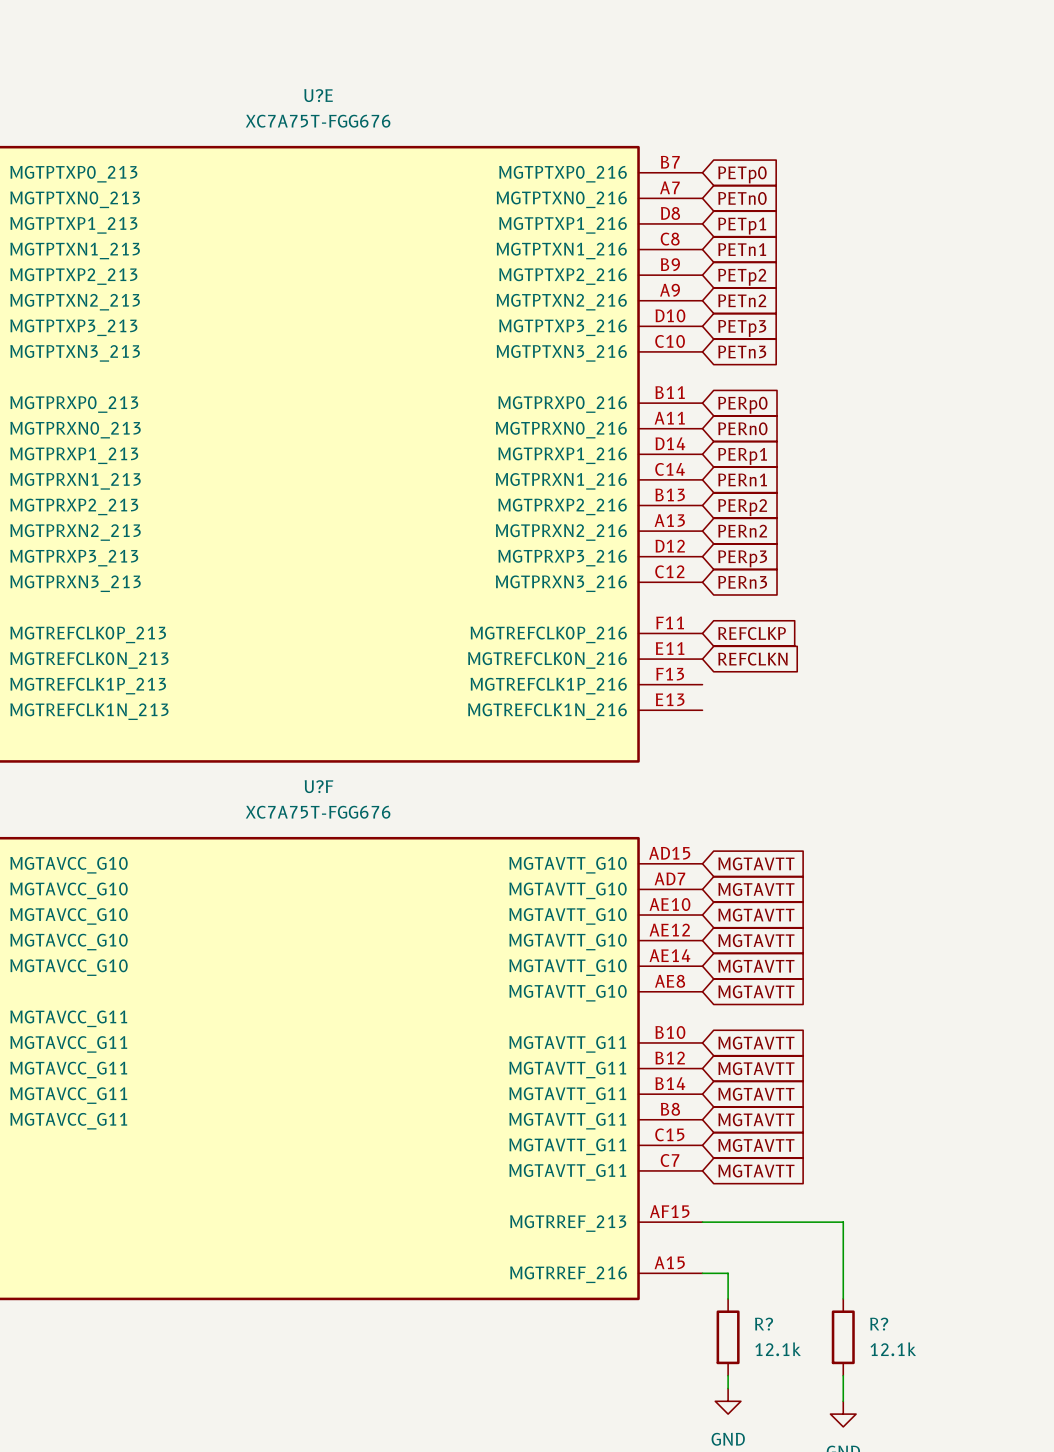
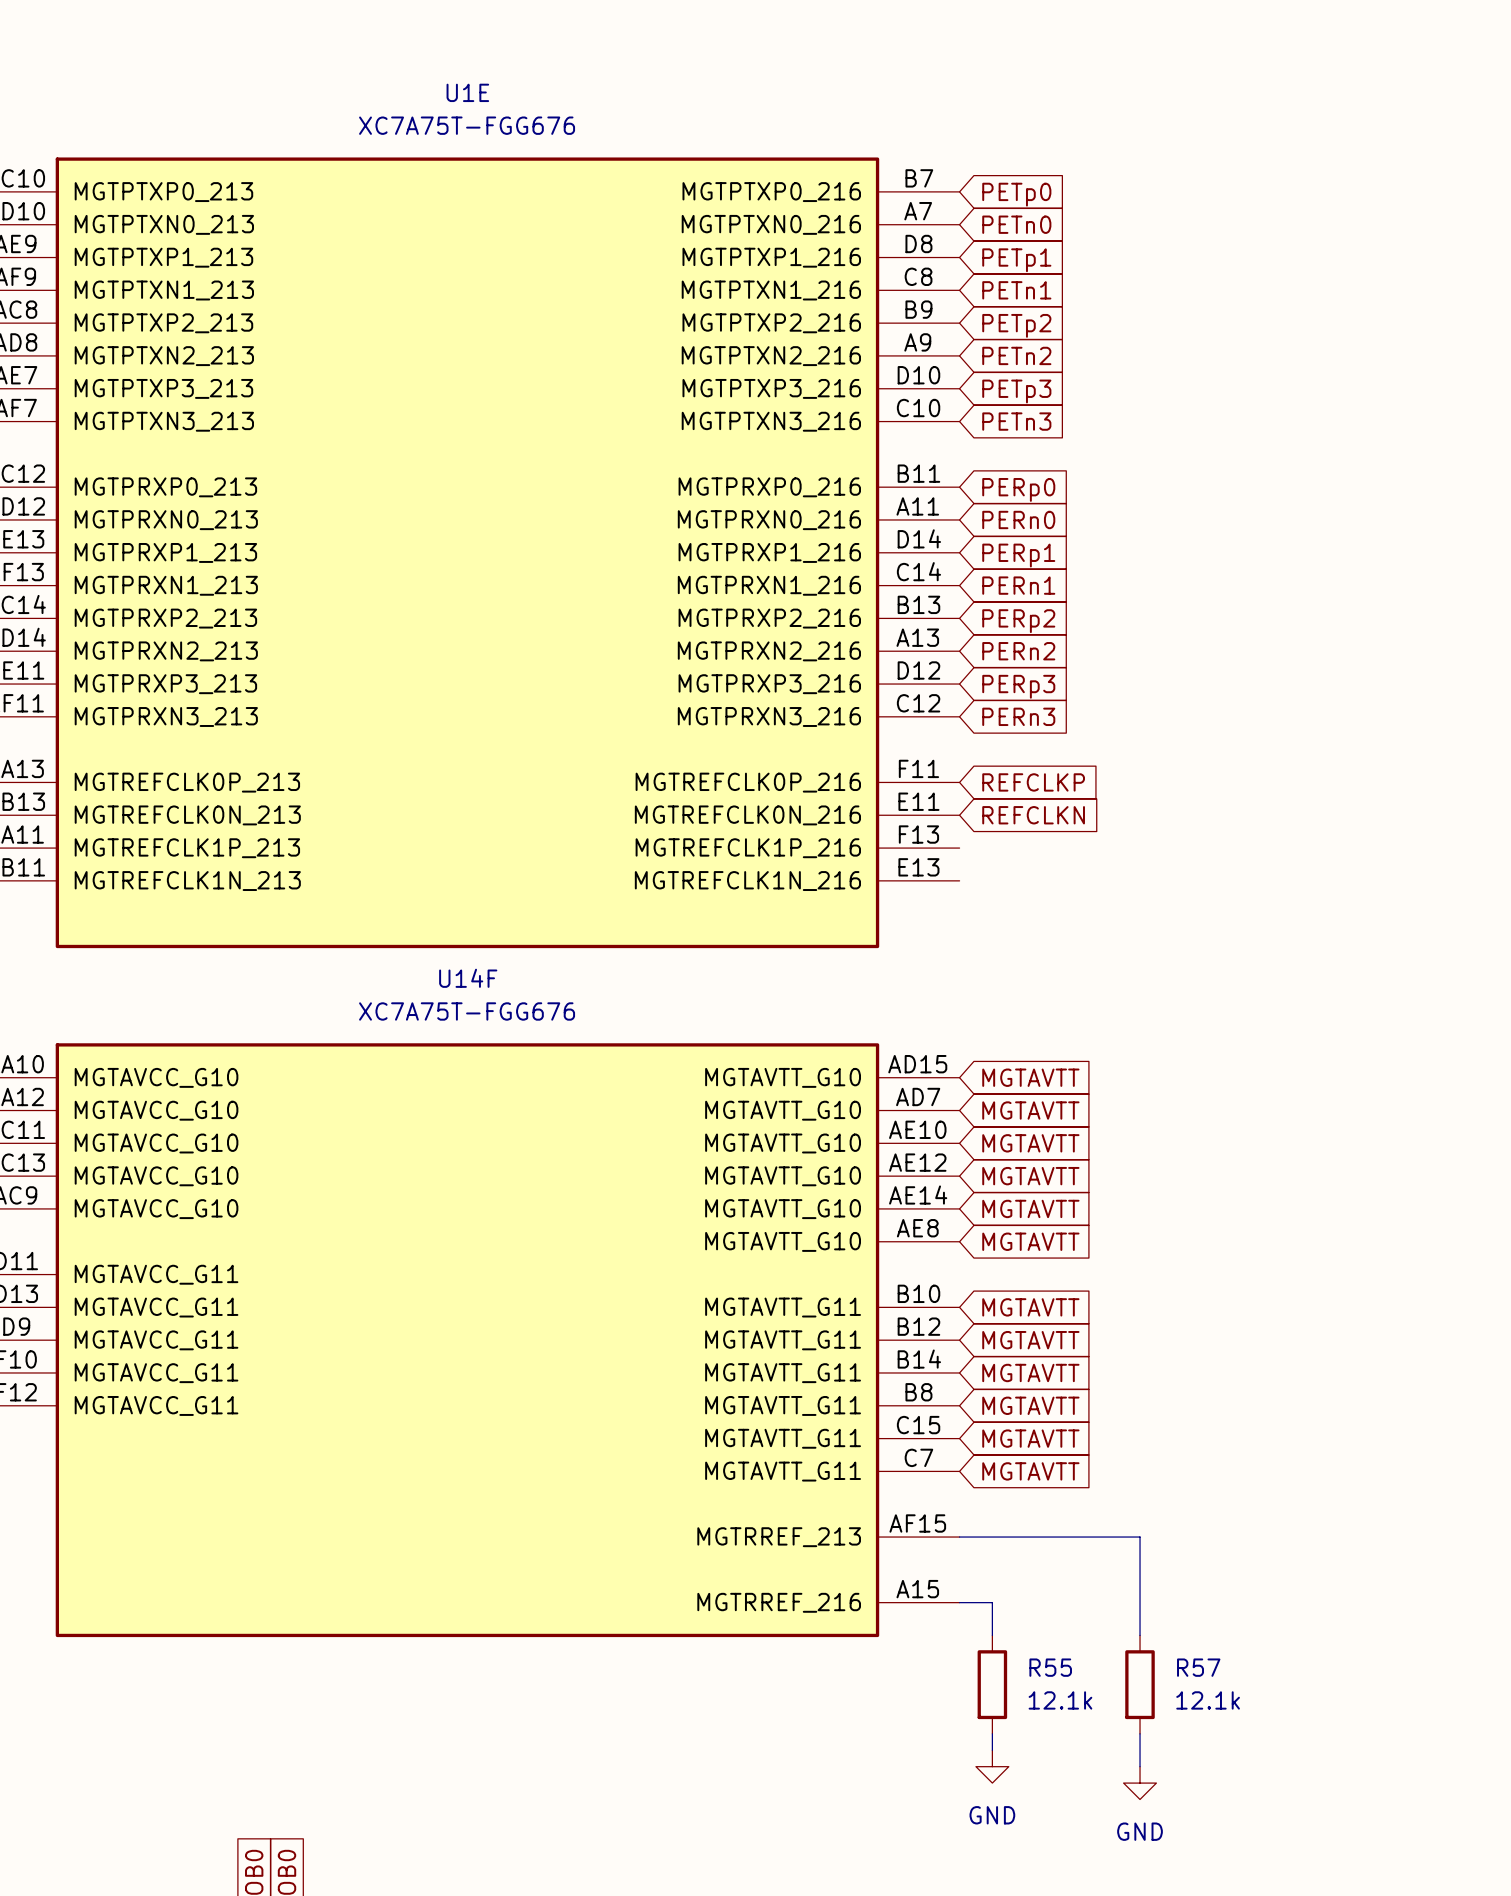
U?E name: U?E (318, 95) -> U1E (467, 92)
U?F name: U?F (318, 786) -> U14F (468, 978)
R? name: R? (764, 1324) -> R55 (1050, 1667)
R? name: R? (879, 1324) -> R57 (1198, 1667)

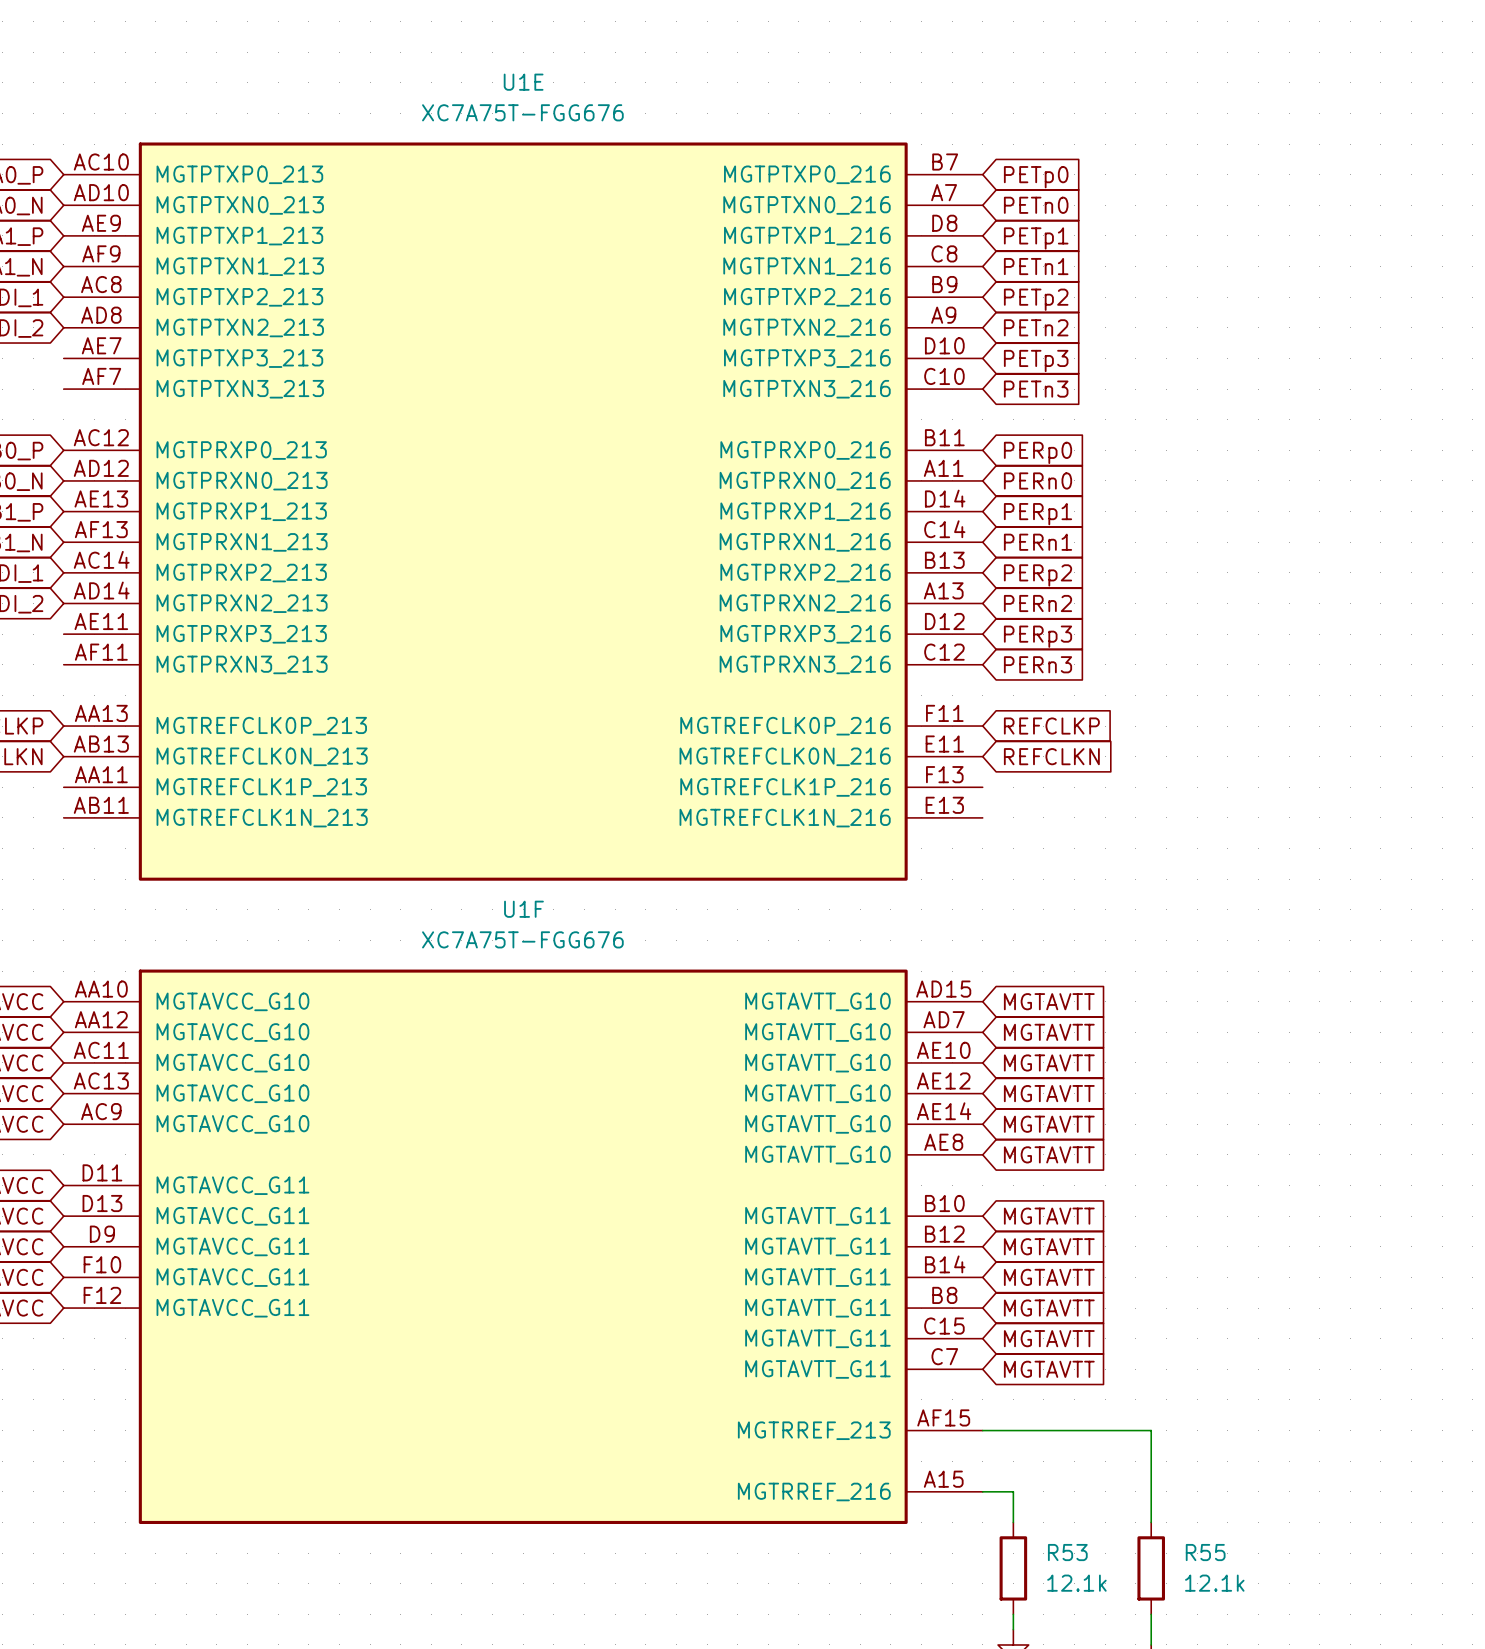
U14F name: U14F (468, 978) -> U1F (523, 909)
R55 name: R55 (1050, 1667) -> R53 (1067, 1552)
R57 name: R57 (1198, 1667) -> R55 (1205, 1552)

